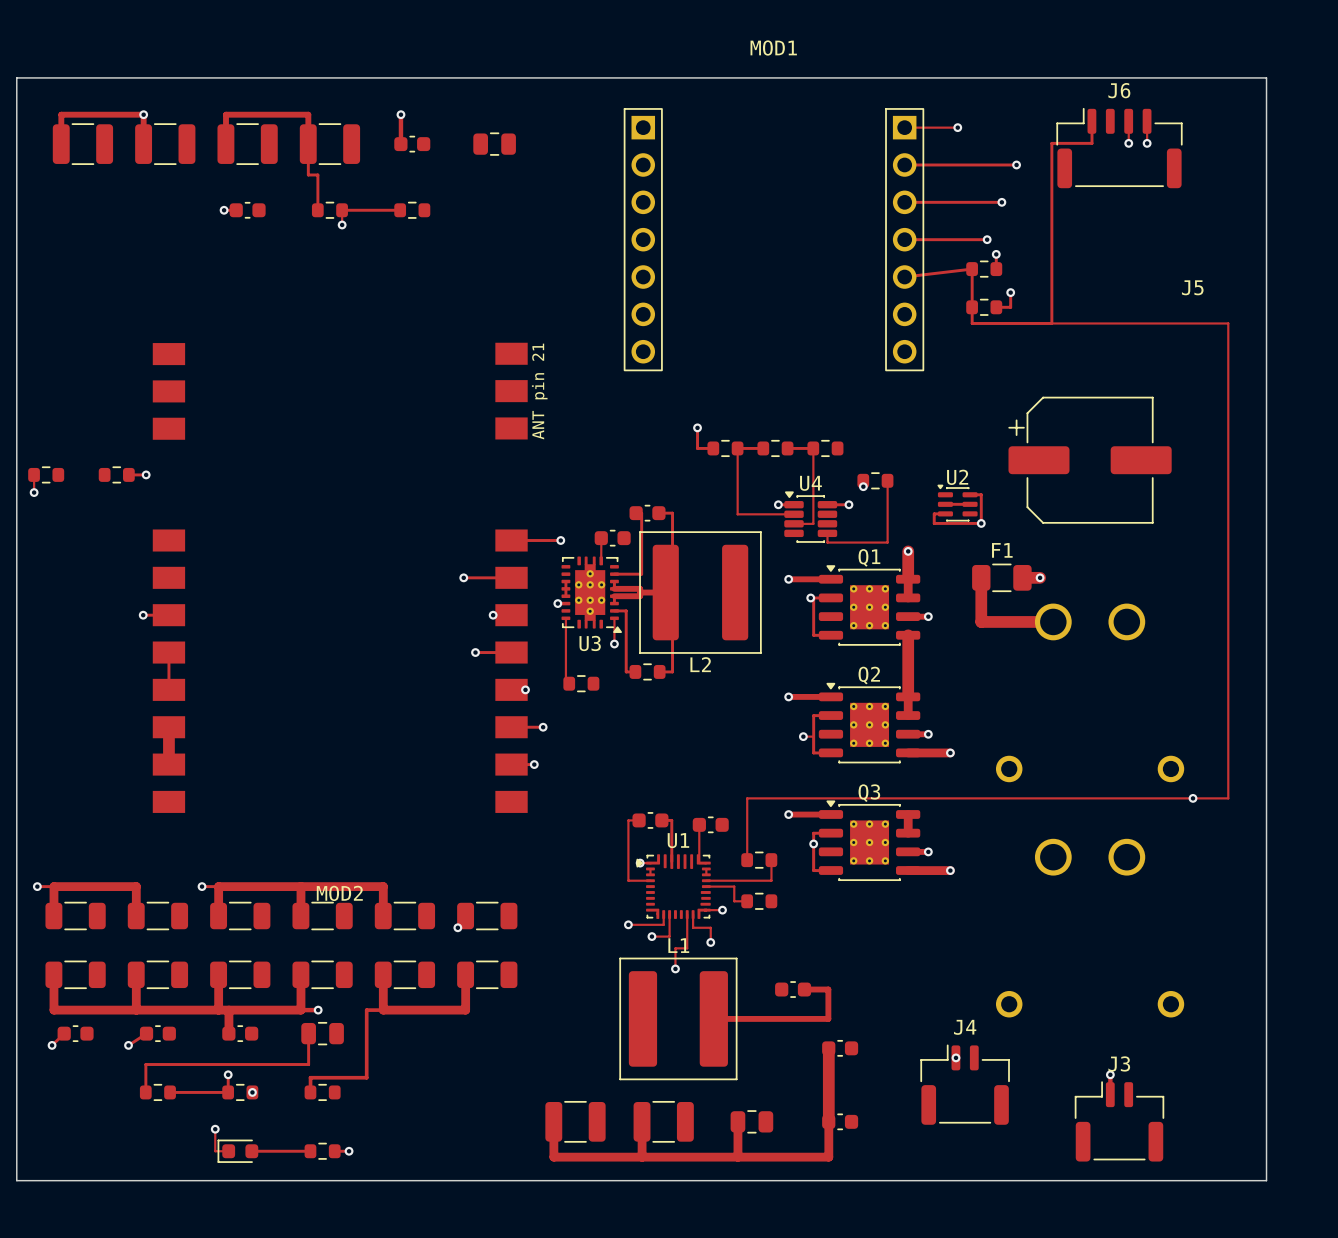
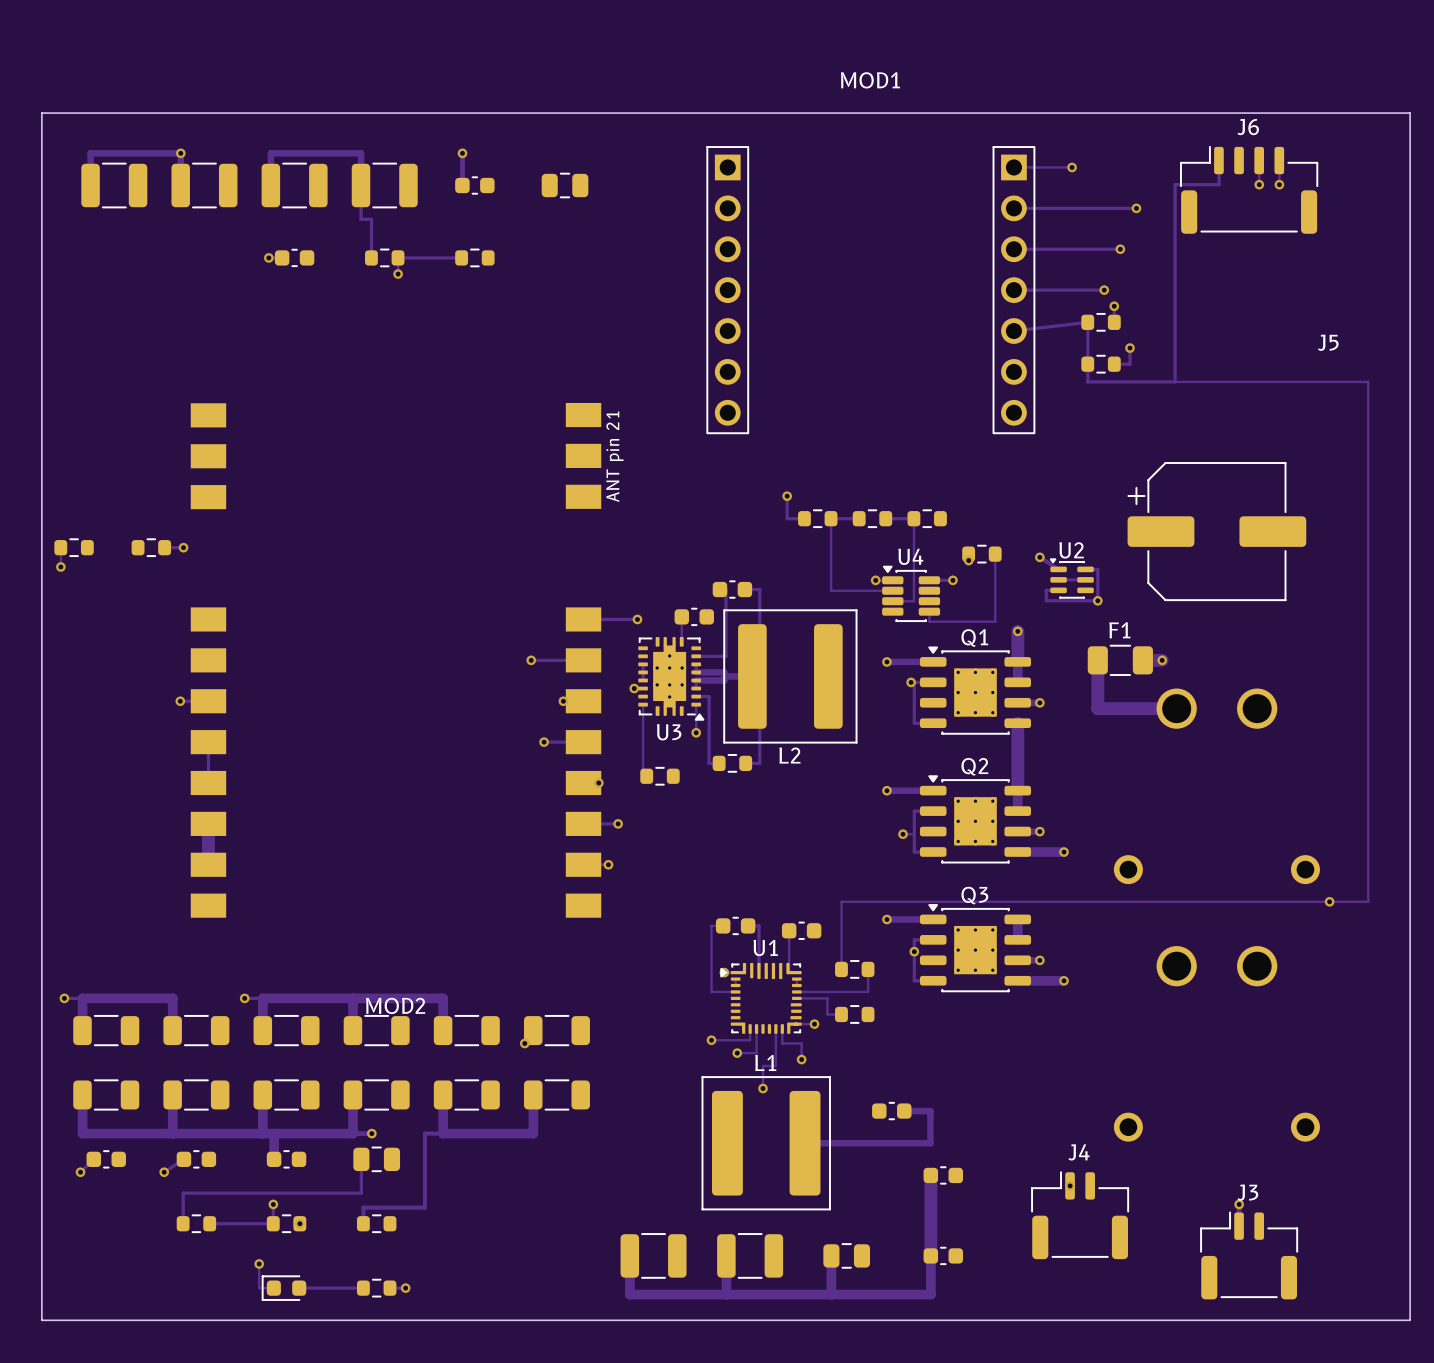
track: none -> (1039, 557) (1058, 569)
via: none -> (1039, 557)

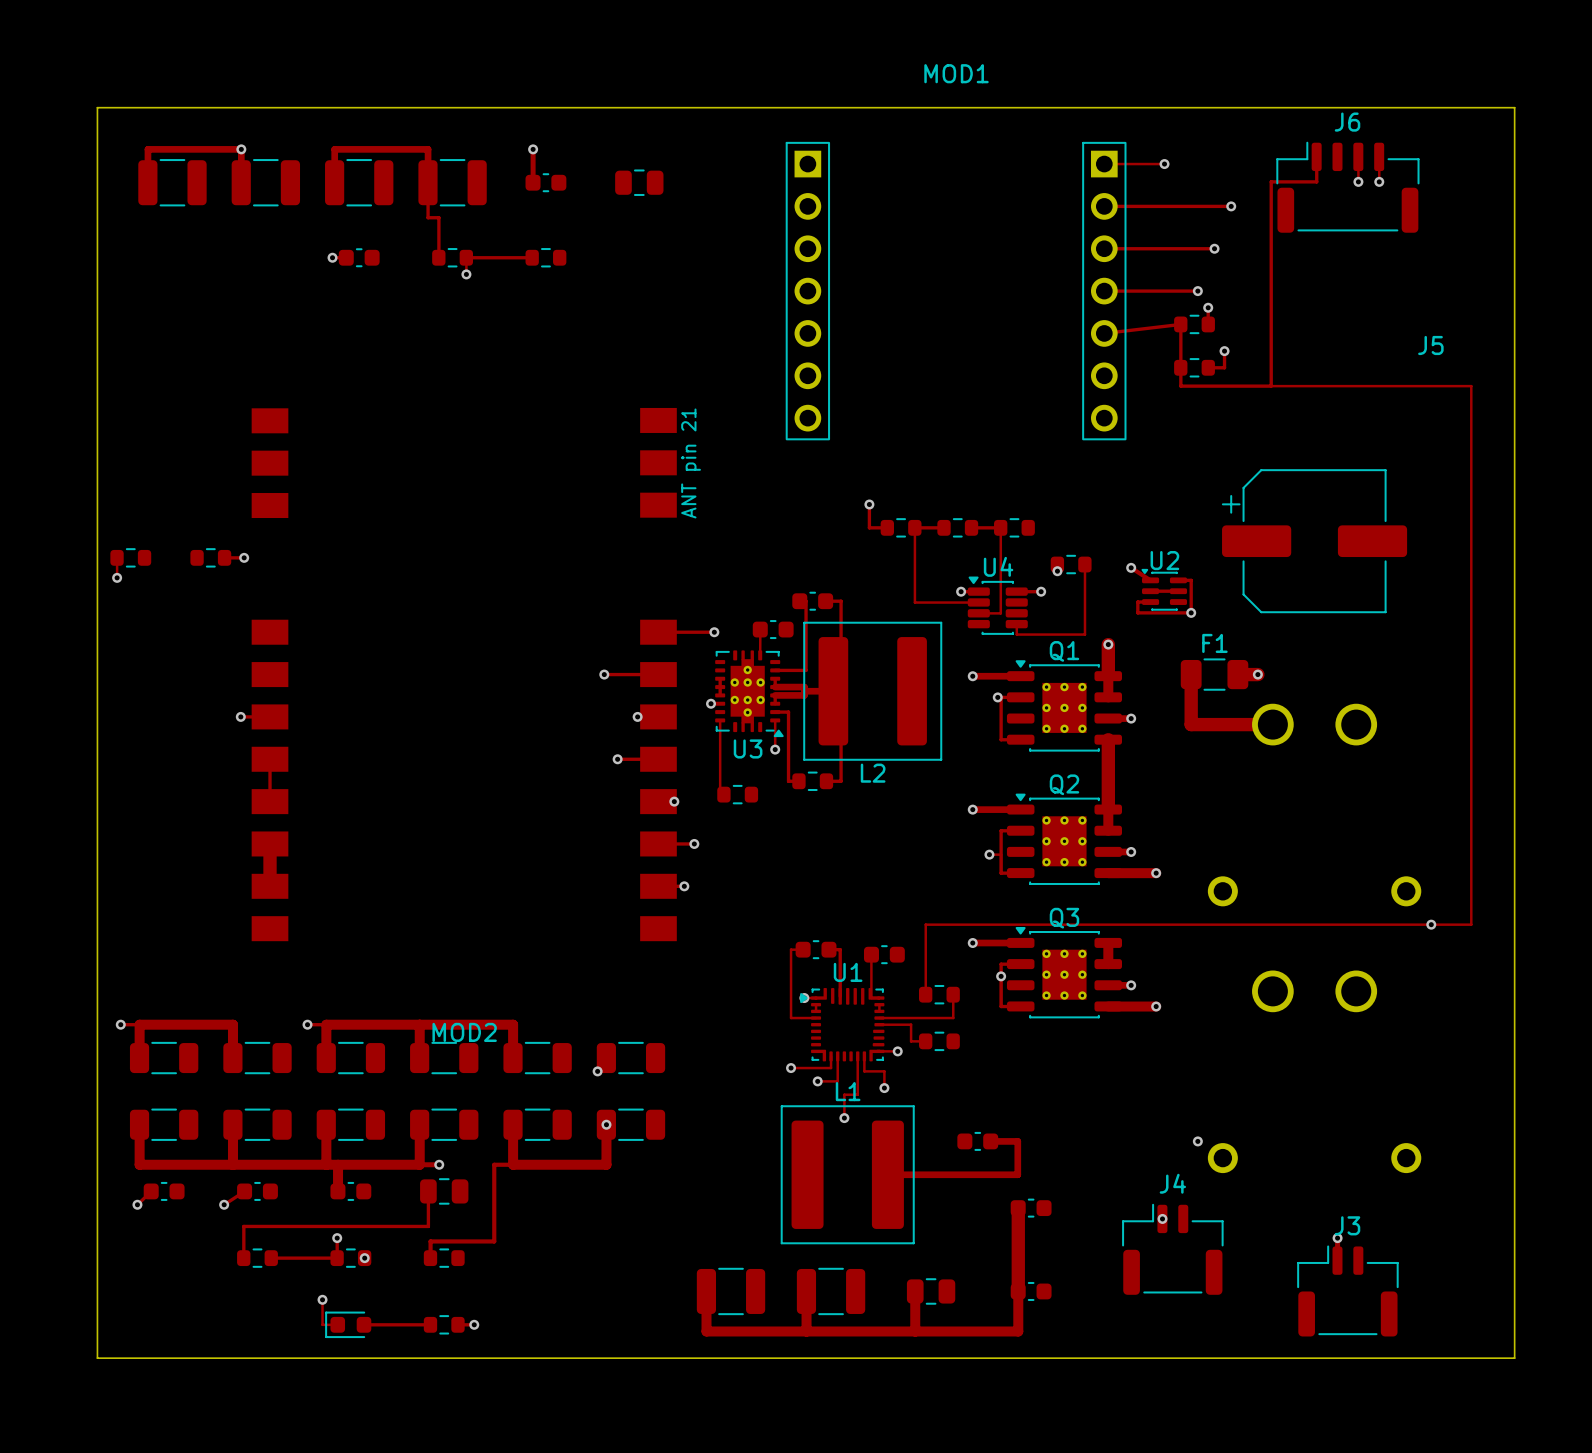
via: none -> (606, 1124)
via: none -> (1197, 1141)

